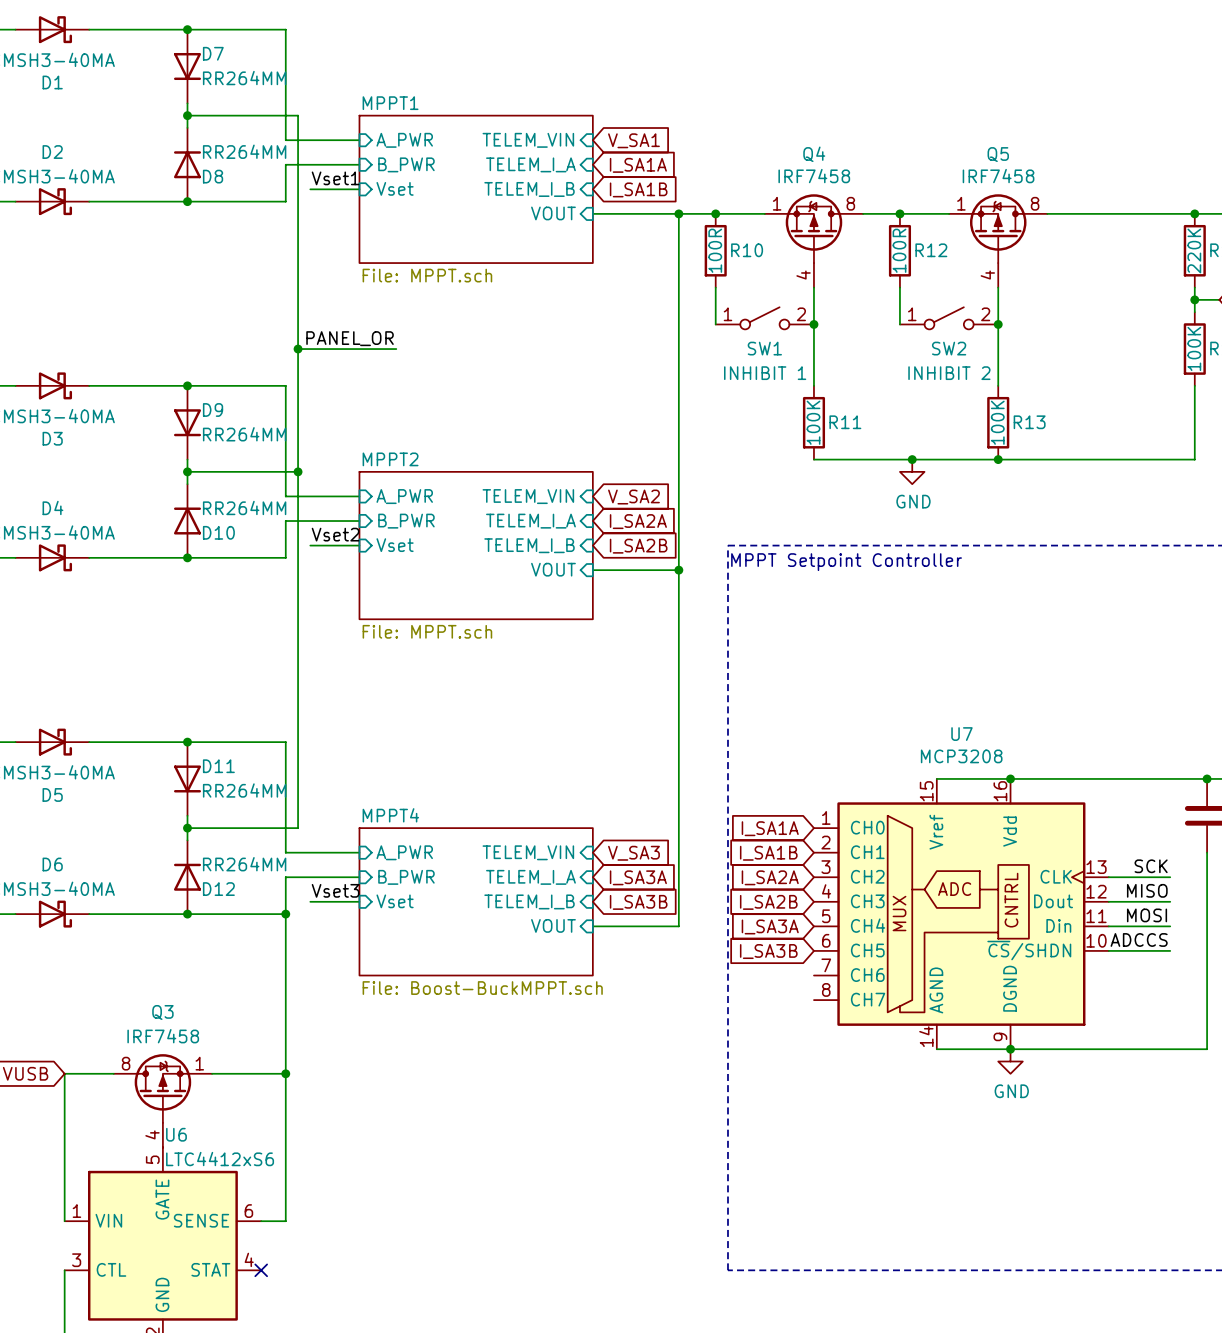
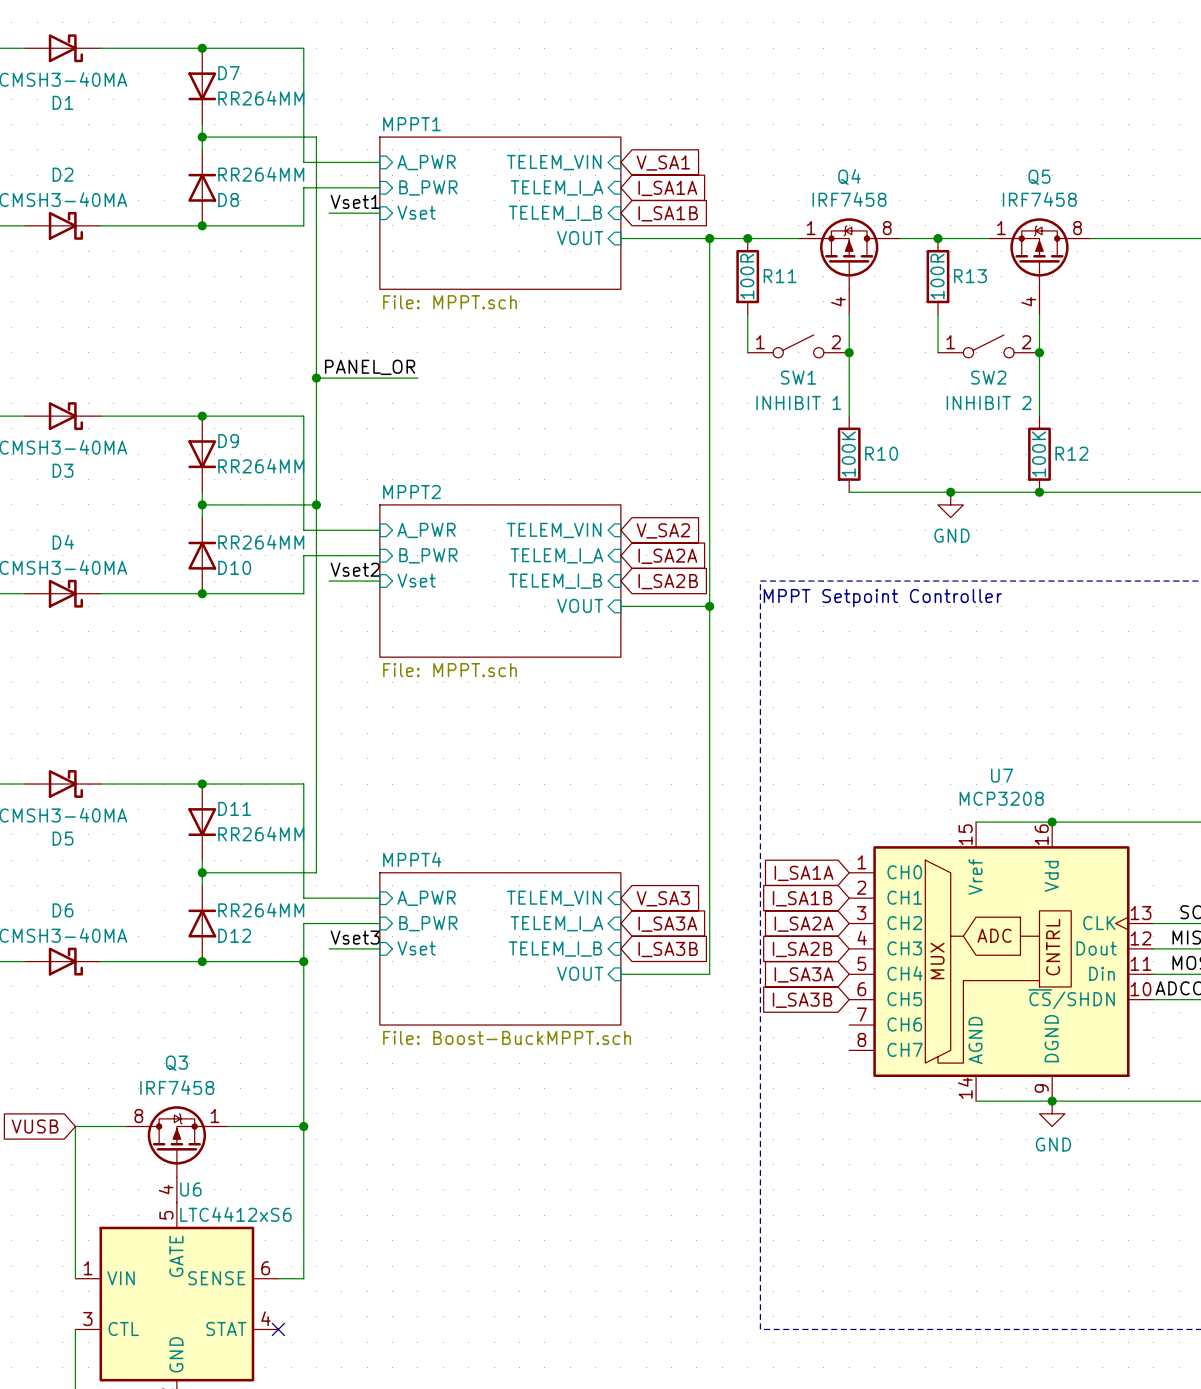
R10 name: R10 (747, 250) -> R11 (780, 276)
R12 name: R12 (931, 250) -> R13 (970, 276)
R11 name: R11 (845, 422) -> R10 (881, 453)
R13 name: R13 (1029, 422) -> R12 (1071, 453)

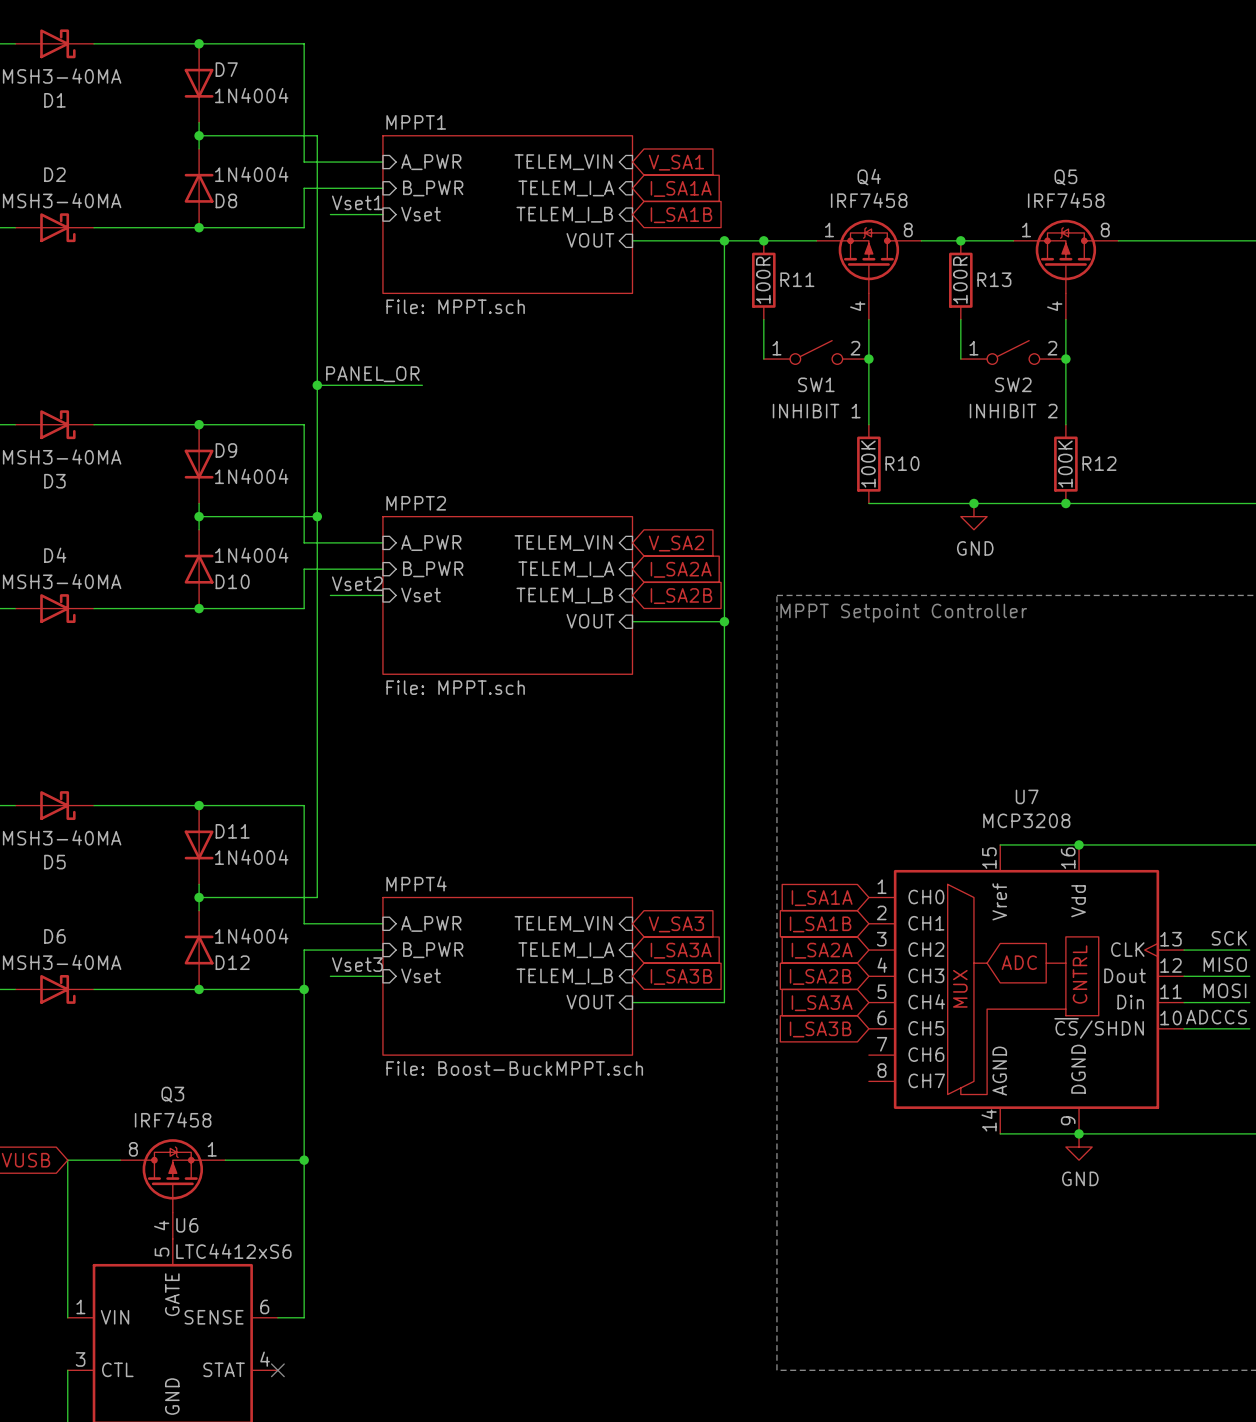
D7 value: RR264MM (261, 98) -> 1N4004 (251, 95)
D8 value: RR264MM (261, 174) -> 1N4004 (251, 174)
D9 value: RR264MM (261, 466) -> 1N4004 (251, 476)
D10 value: RR264MM (261, 542) -> 1N4004 (251, 555)
D11 value: RR264MM (261, 833) -> 1N4004 (251, 857)
D12 value: RR264MM (261, 910) -> 1N4004 (251, 936)

